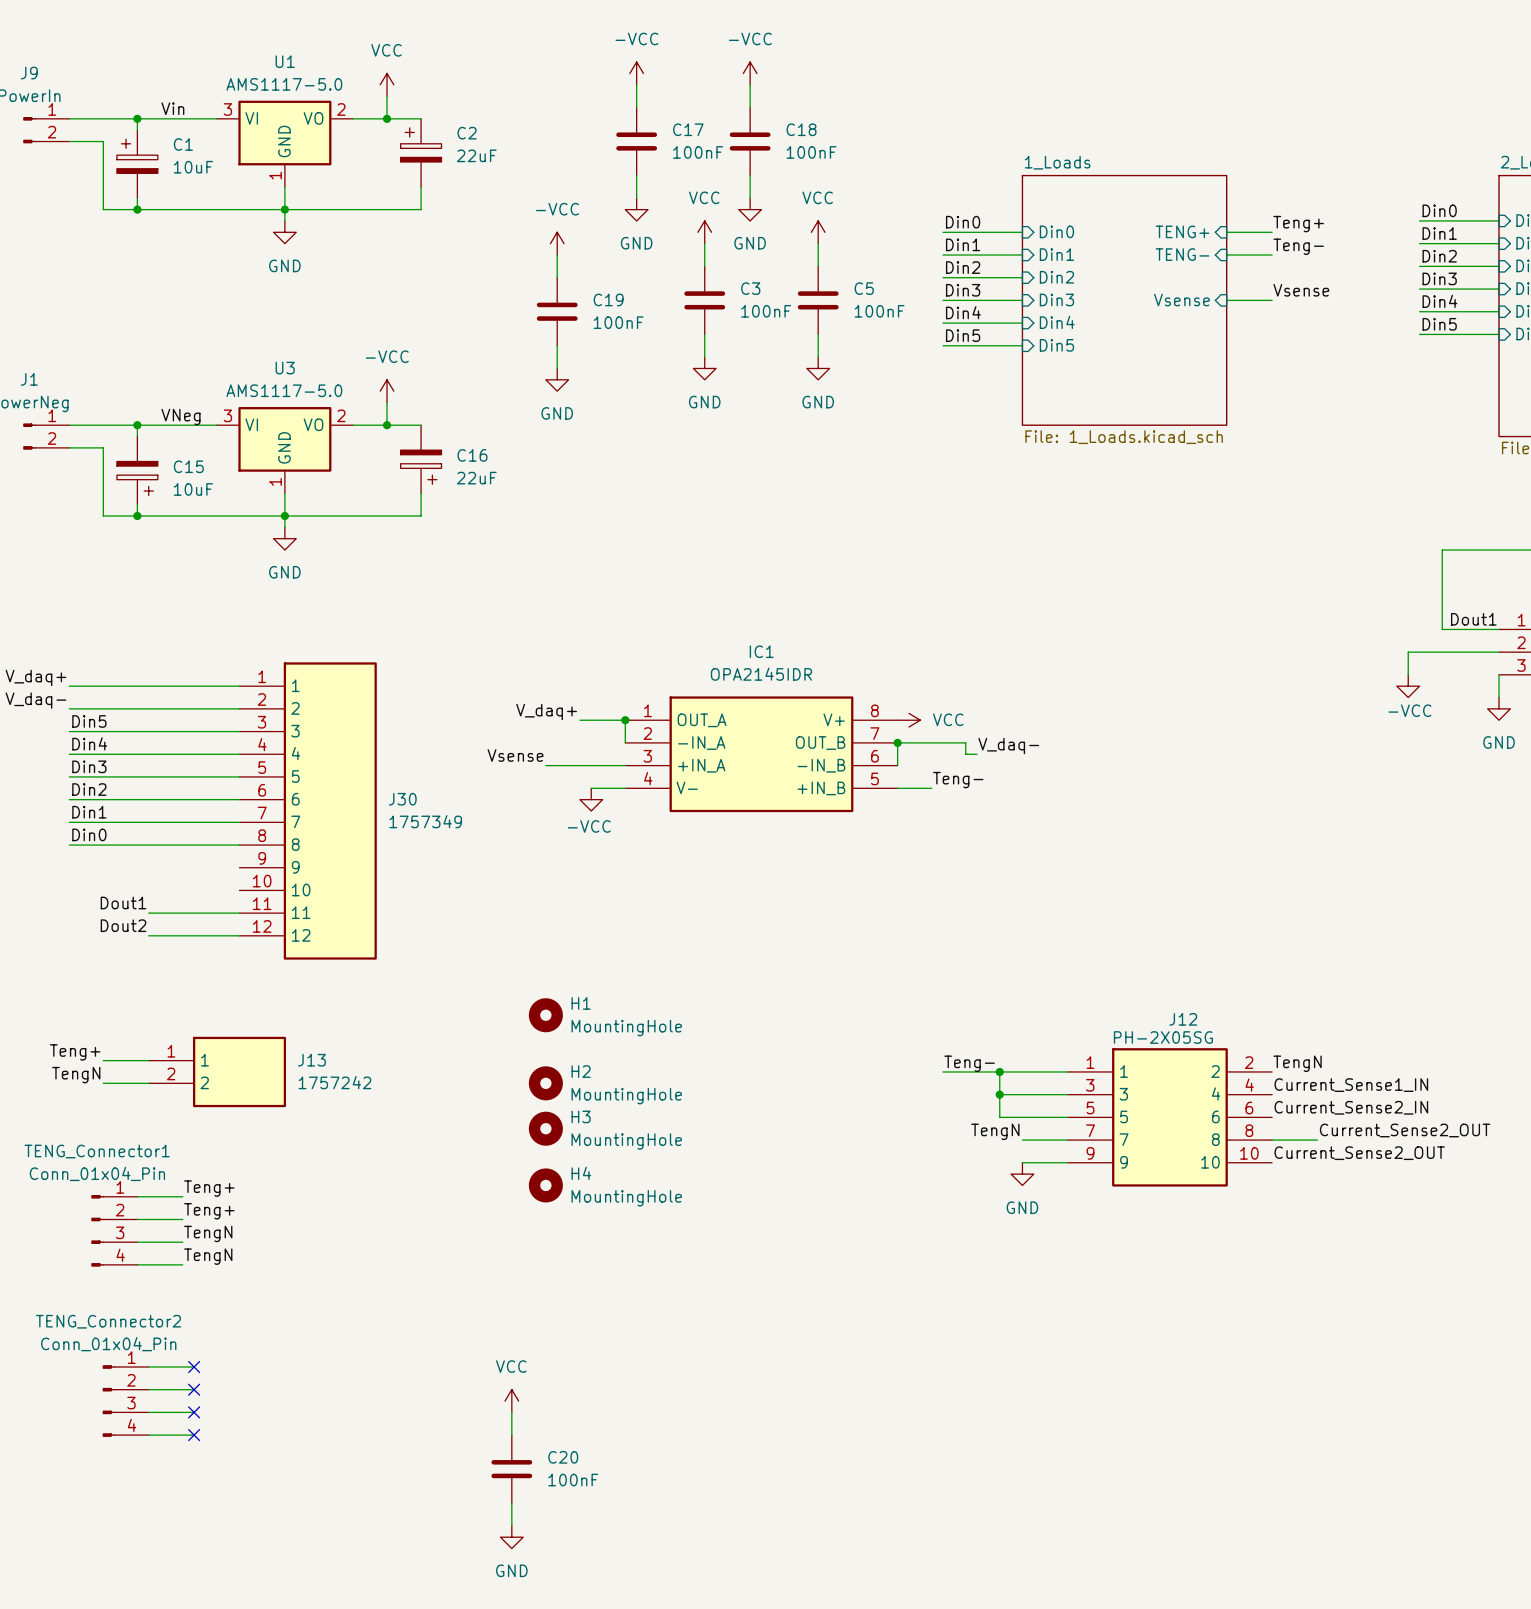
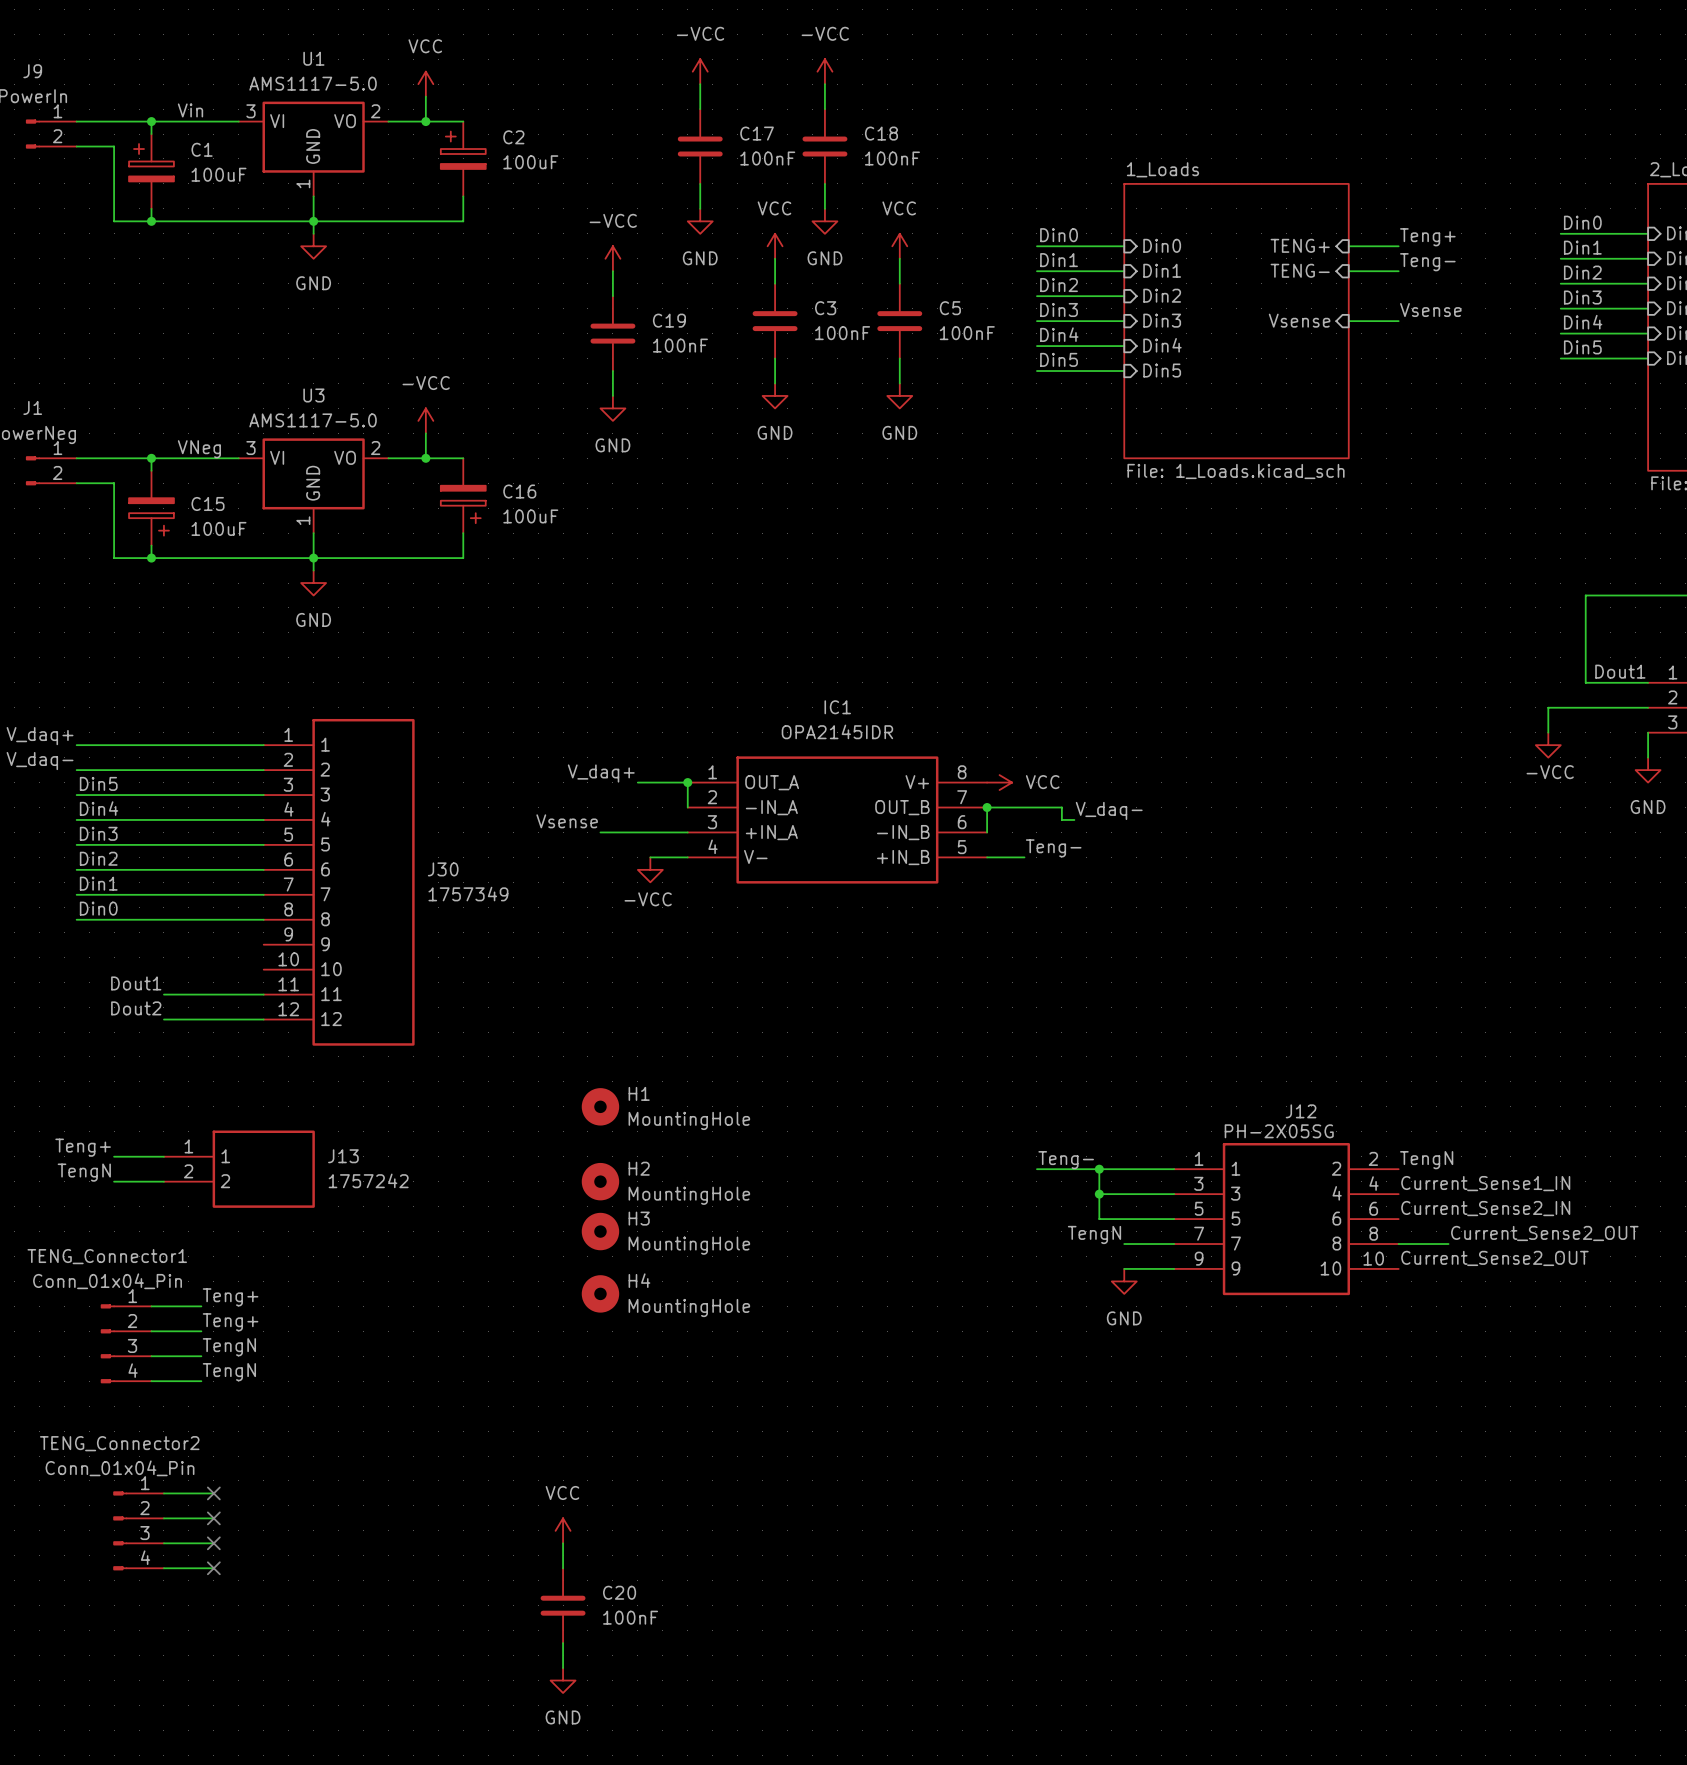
C2 value: 22uF (476, 155) -> 100uF (530, 162)
C1 value: 10uF (193, 167) -> 100uF (218, 174)
C16 value: 22uF (476, 478) -> 100uF (530, 516)
C15 value: 10uF (193, 489) -> 100uF (218, 528)

